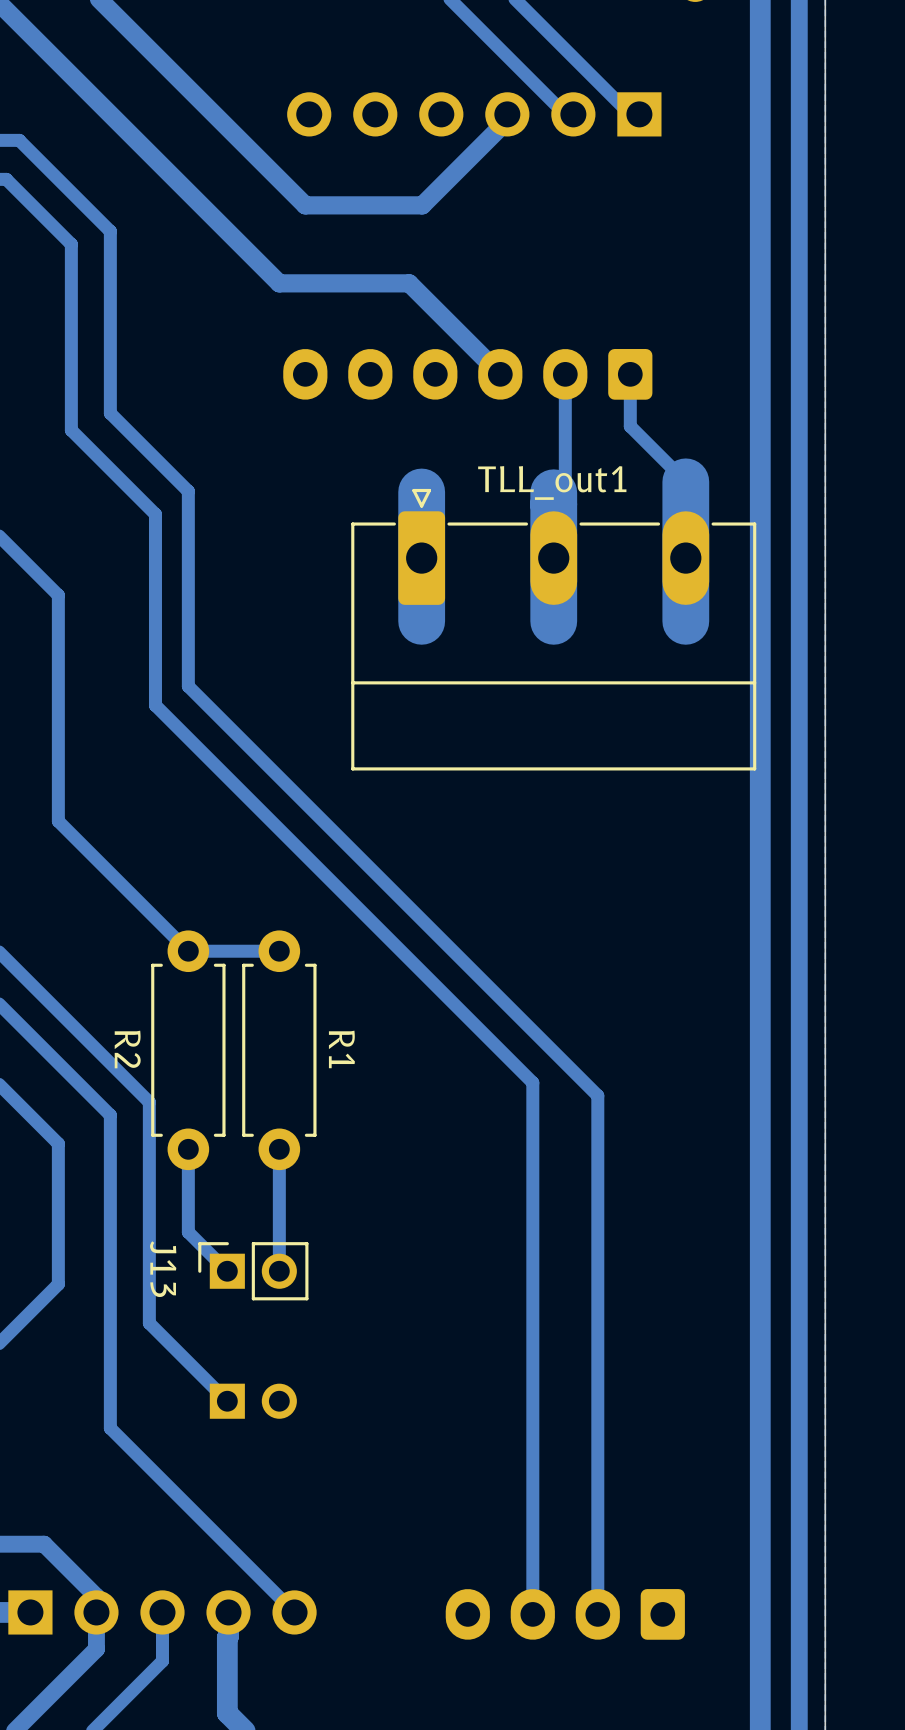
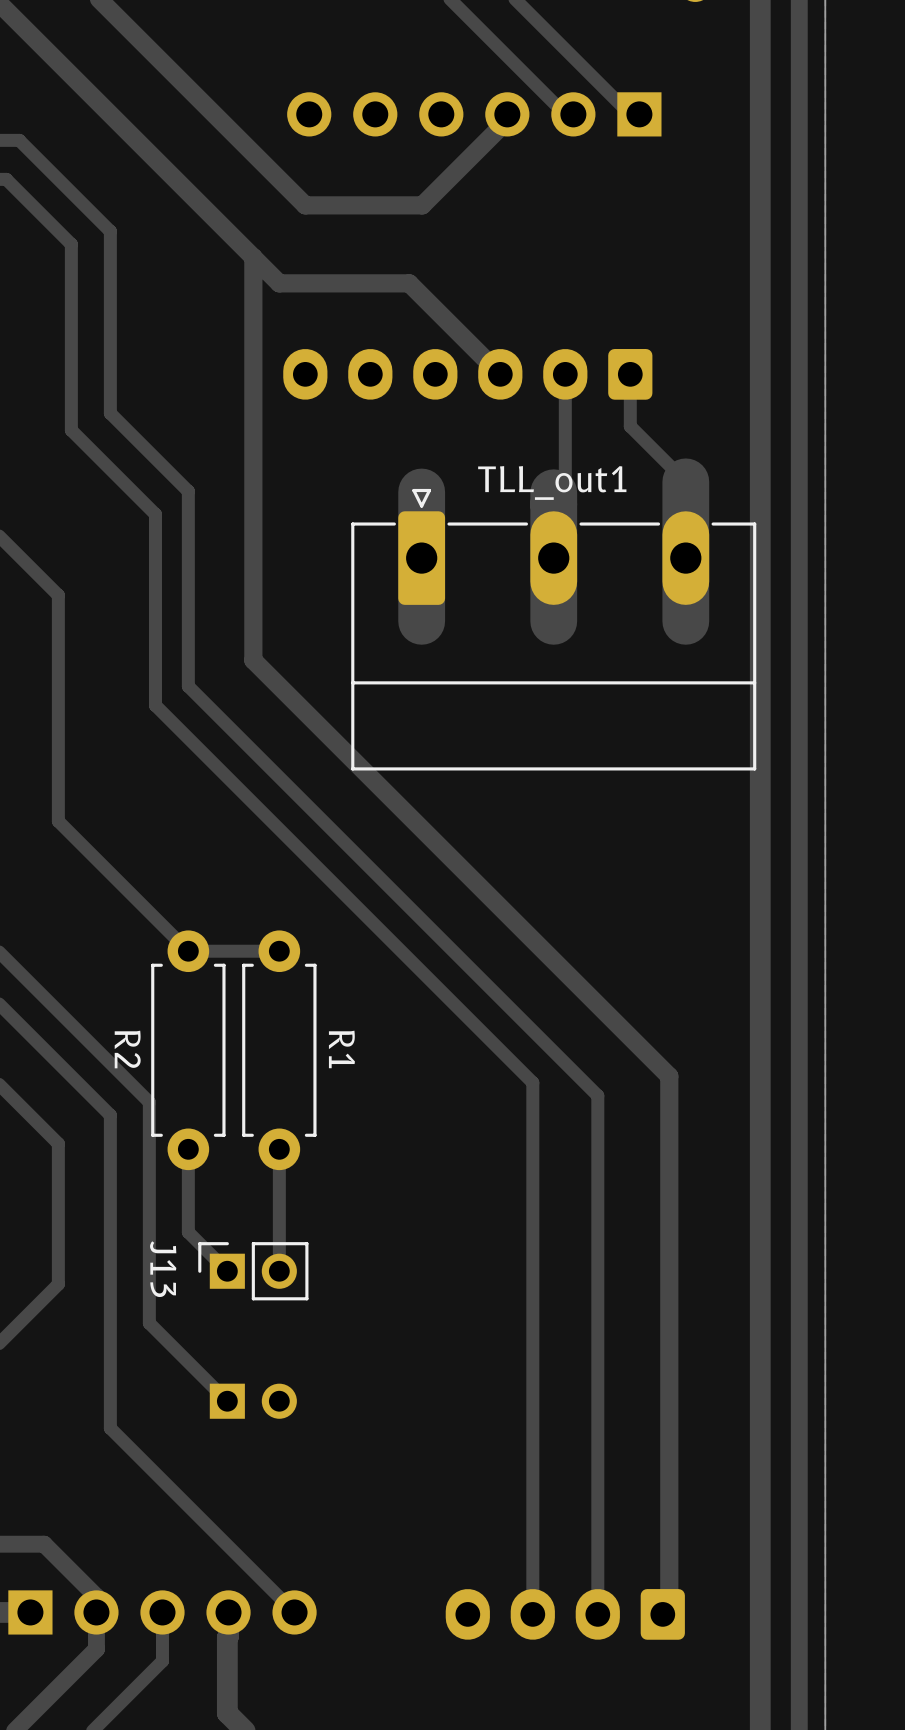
track: none -> (253, 257) (253, 660) (669, 1076) (669, 1607) (662, 1614)

